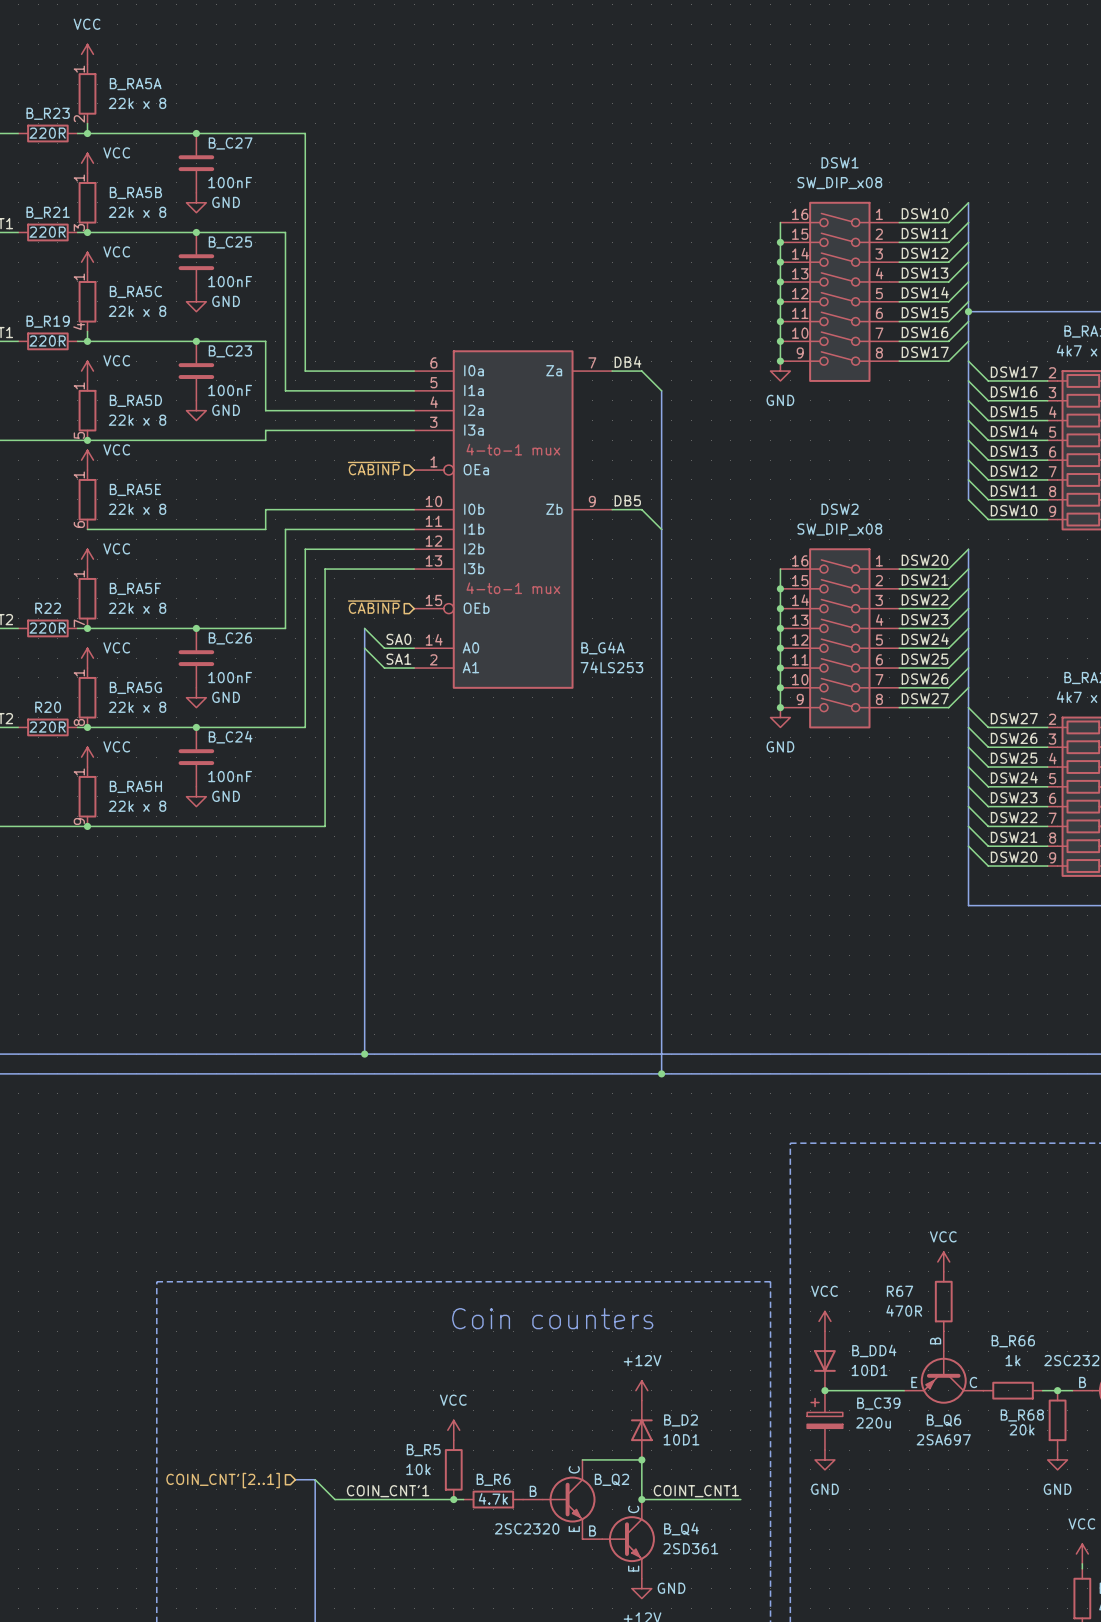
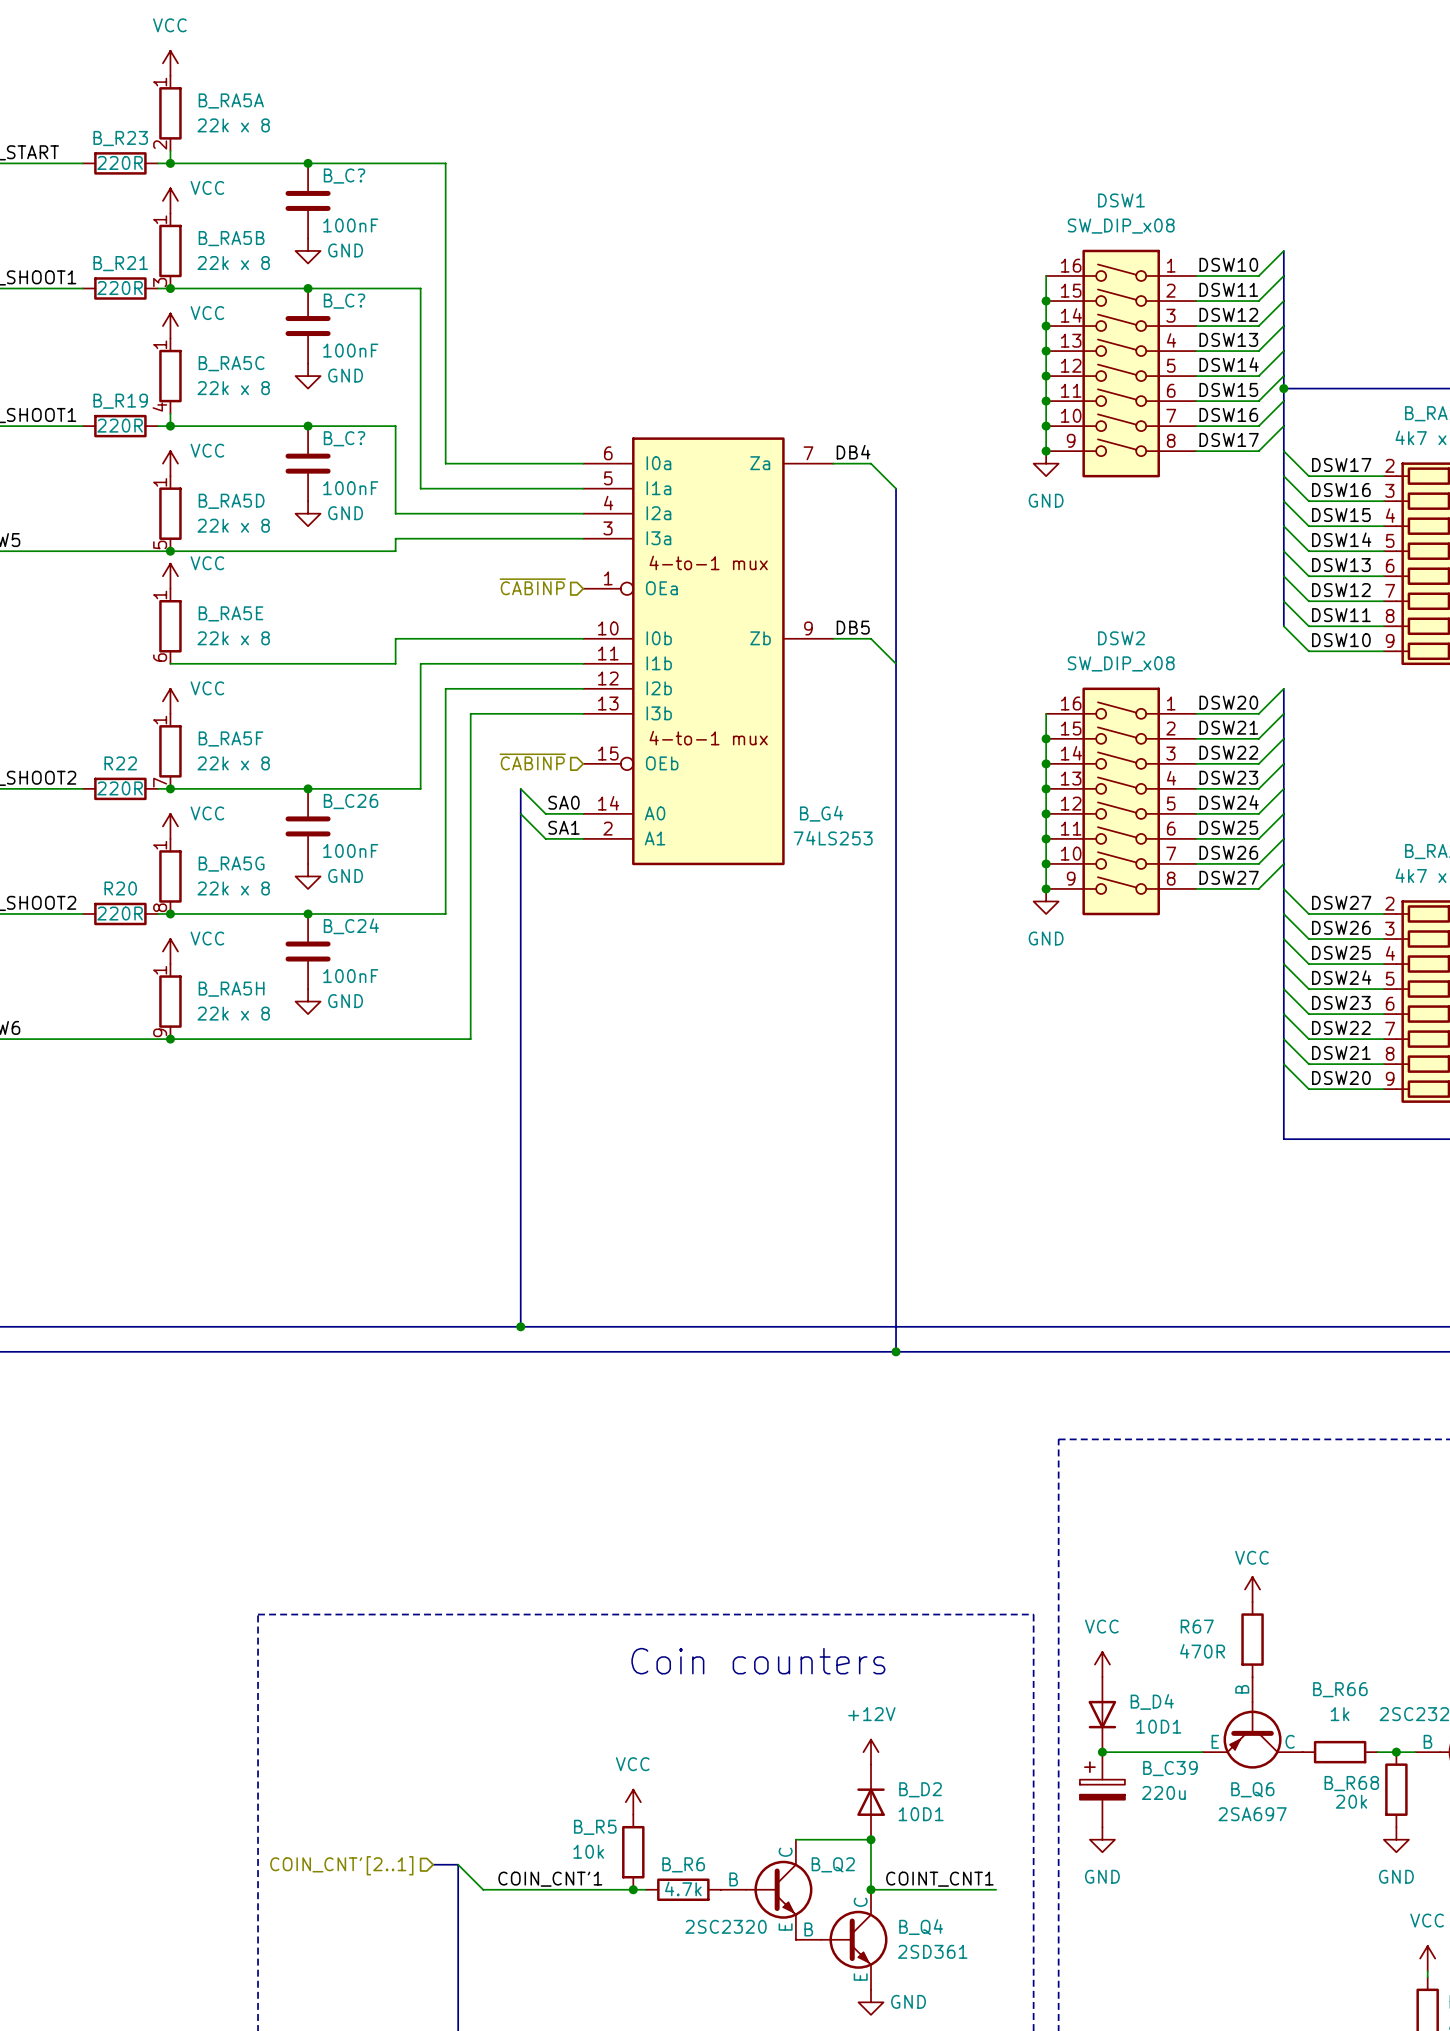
B_C27 name: B_C27 (230, 143) -> B_C? (344, 176)
B_C25 name: B_C25 (230, 242) -> B_C? (344, 301)
B_C23 name: B_C23 (230, 351) -> B_C? (344, 438)
B_G4A name: B_G4A (602, 648) -> B_G4 (821, 813)
B_DD4 name: B_DD4 (874, 1350) -> B_D4 (1152, 1701)

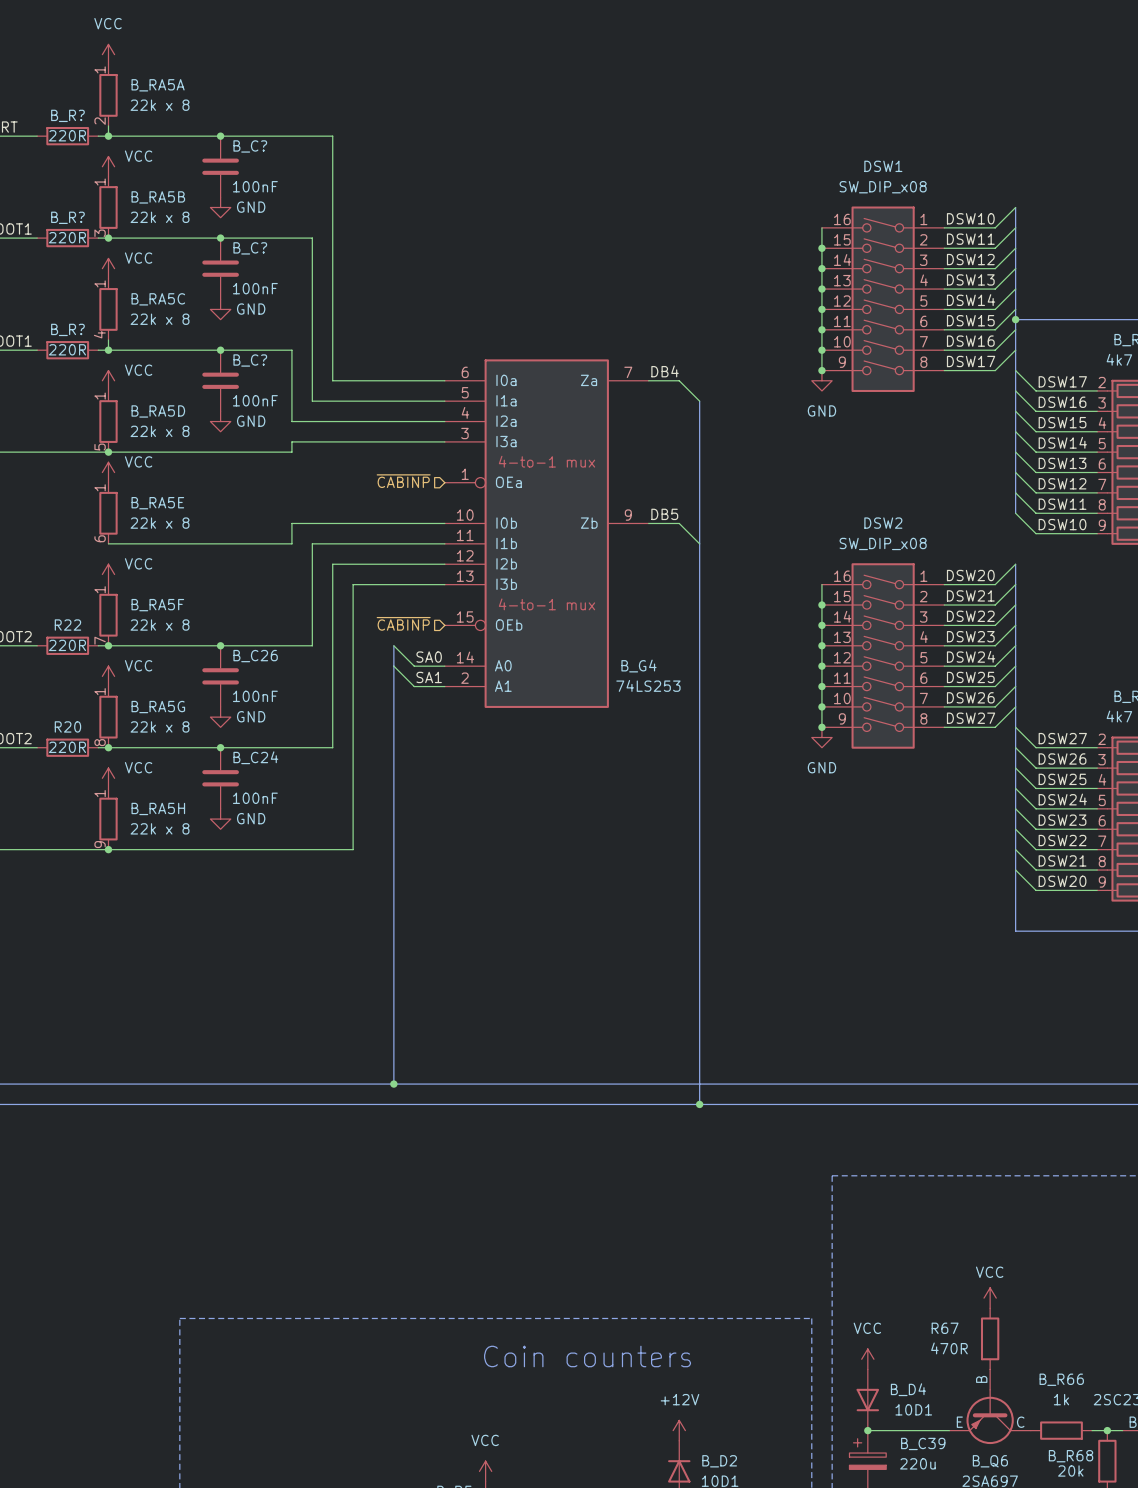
B_R23 name: B_R23 (120, 138) -> B_R? (67, 115)
B_R21 name: B_R21 (120, 263) -> B_R? (67, 217)
B_R19 name: B_R19 (120, 401) -> B_R? (67, 329)

